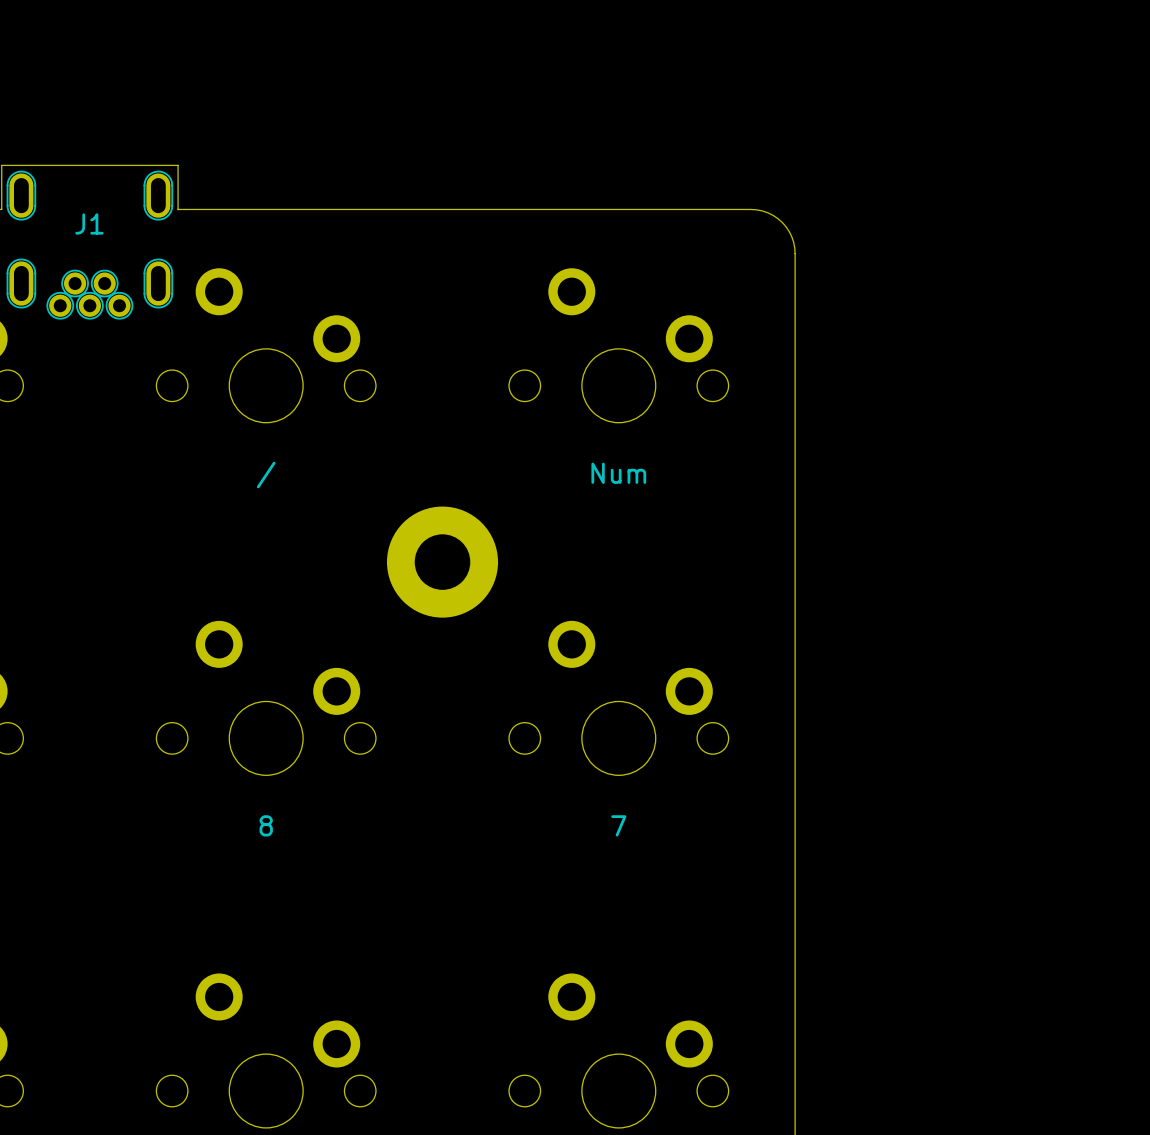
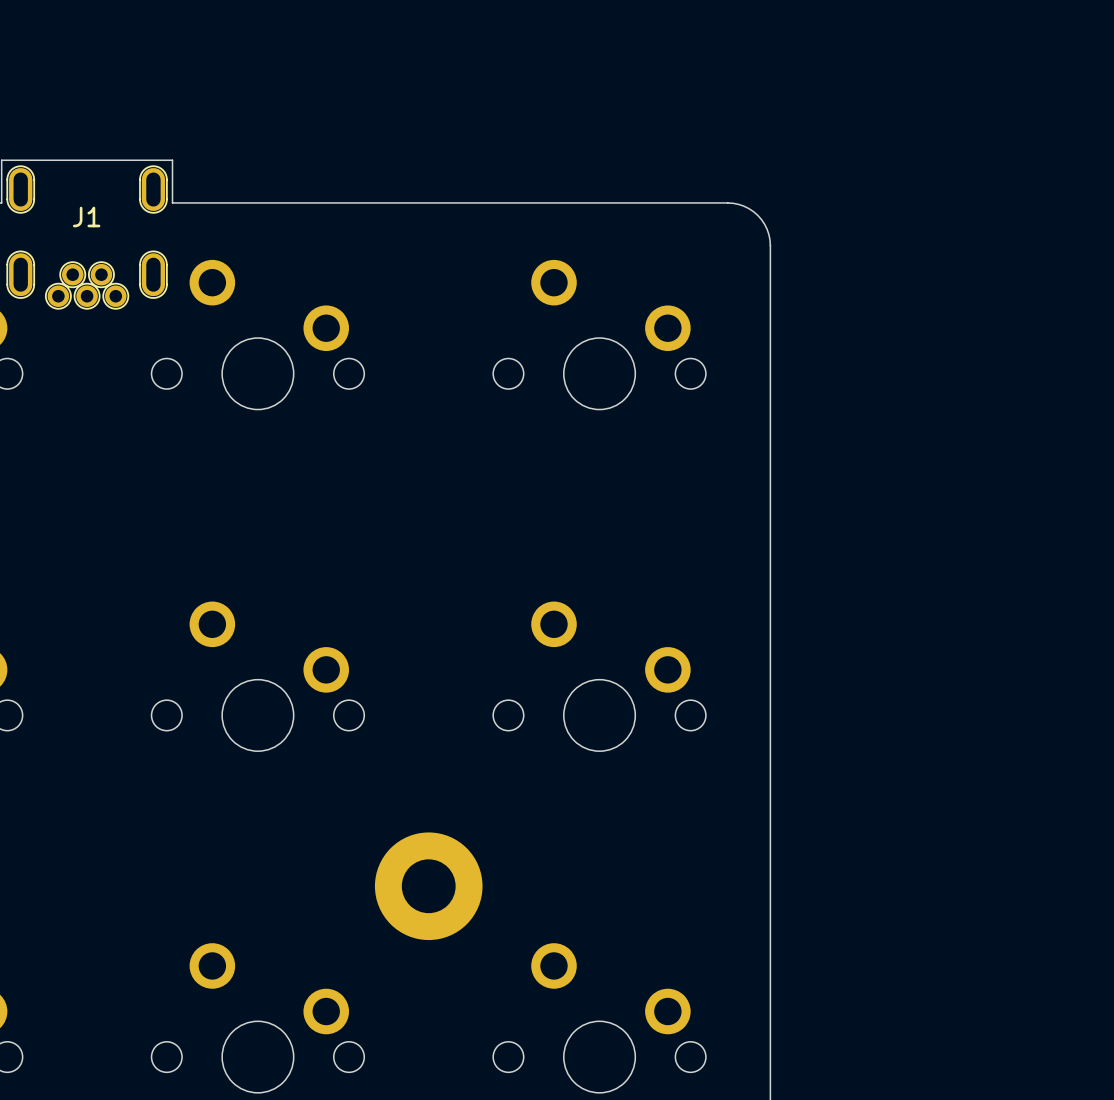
part value: Num (618, 473) -> none
part value: / (266, 475) -> none
part position: (442, 562) -> (428, 886)
part value: 8 (266, 825) -> none
part value: 7 (618, 825) -> none

